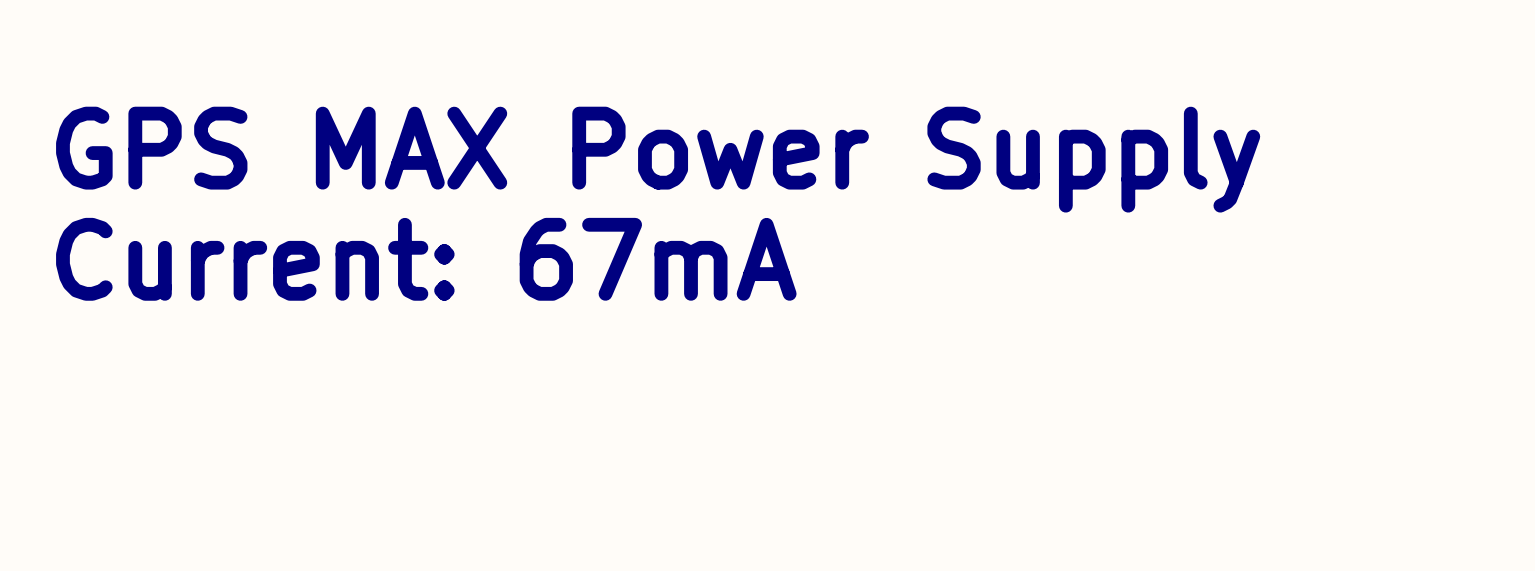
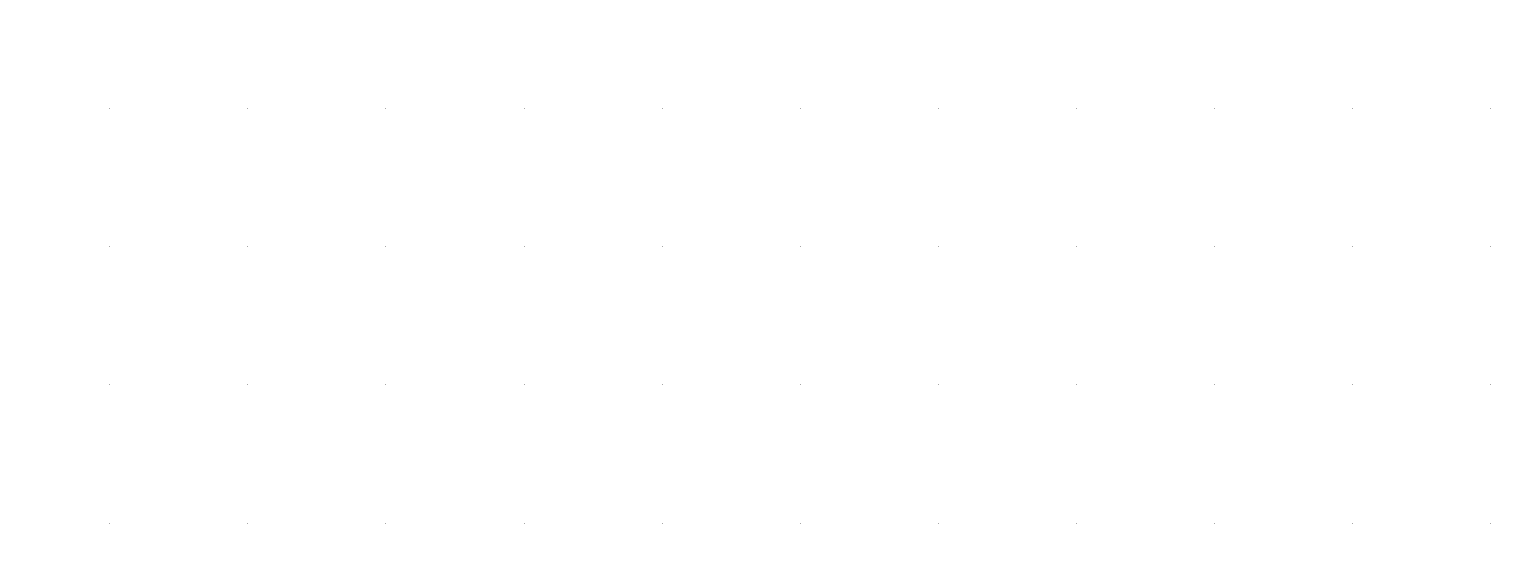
text: GPS MAX Power Supply (658, 159) -> none
text: Current: 67mA (426, 259) -> none

